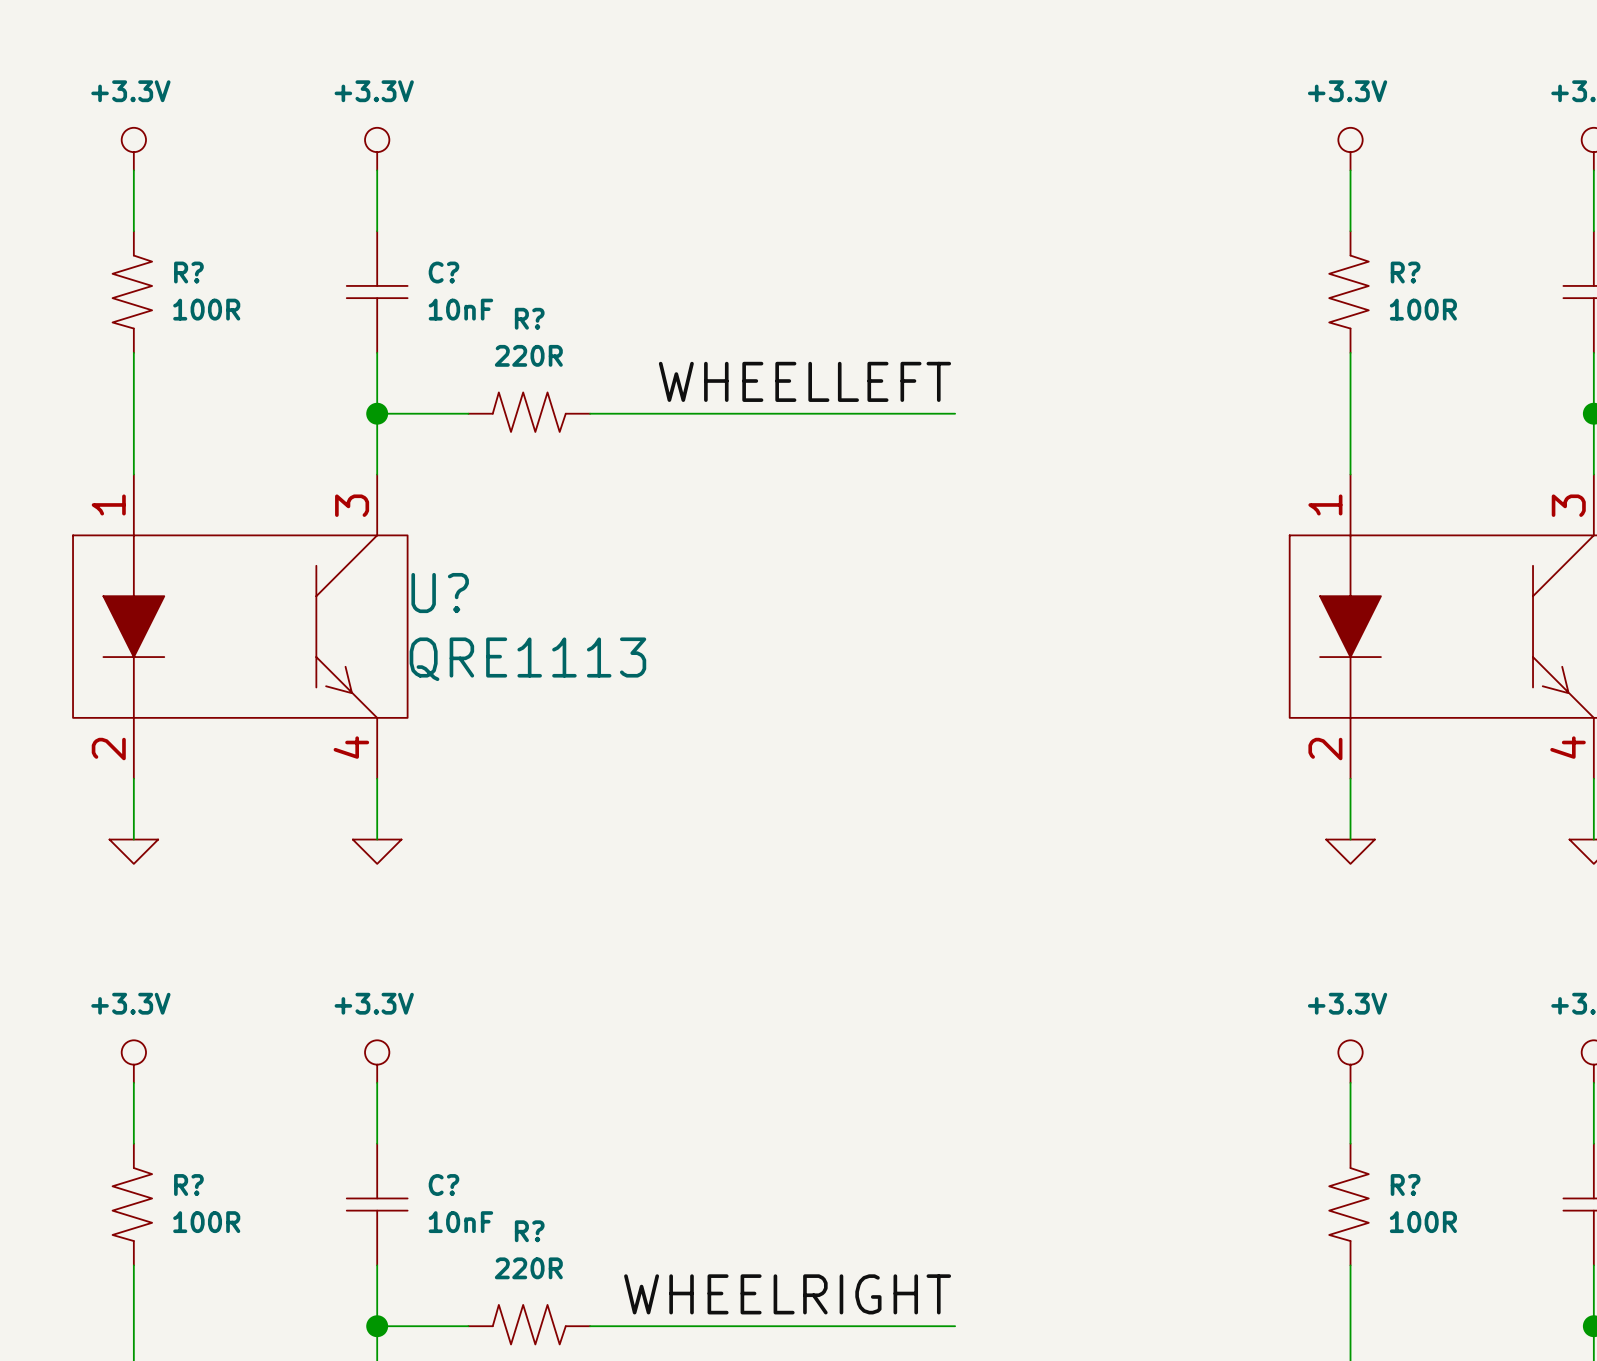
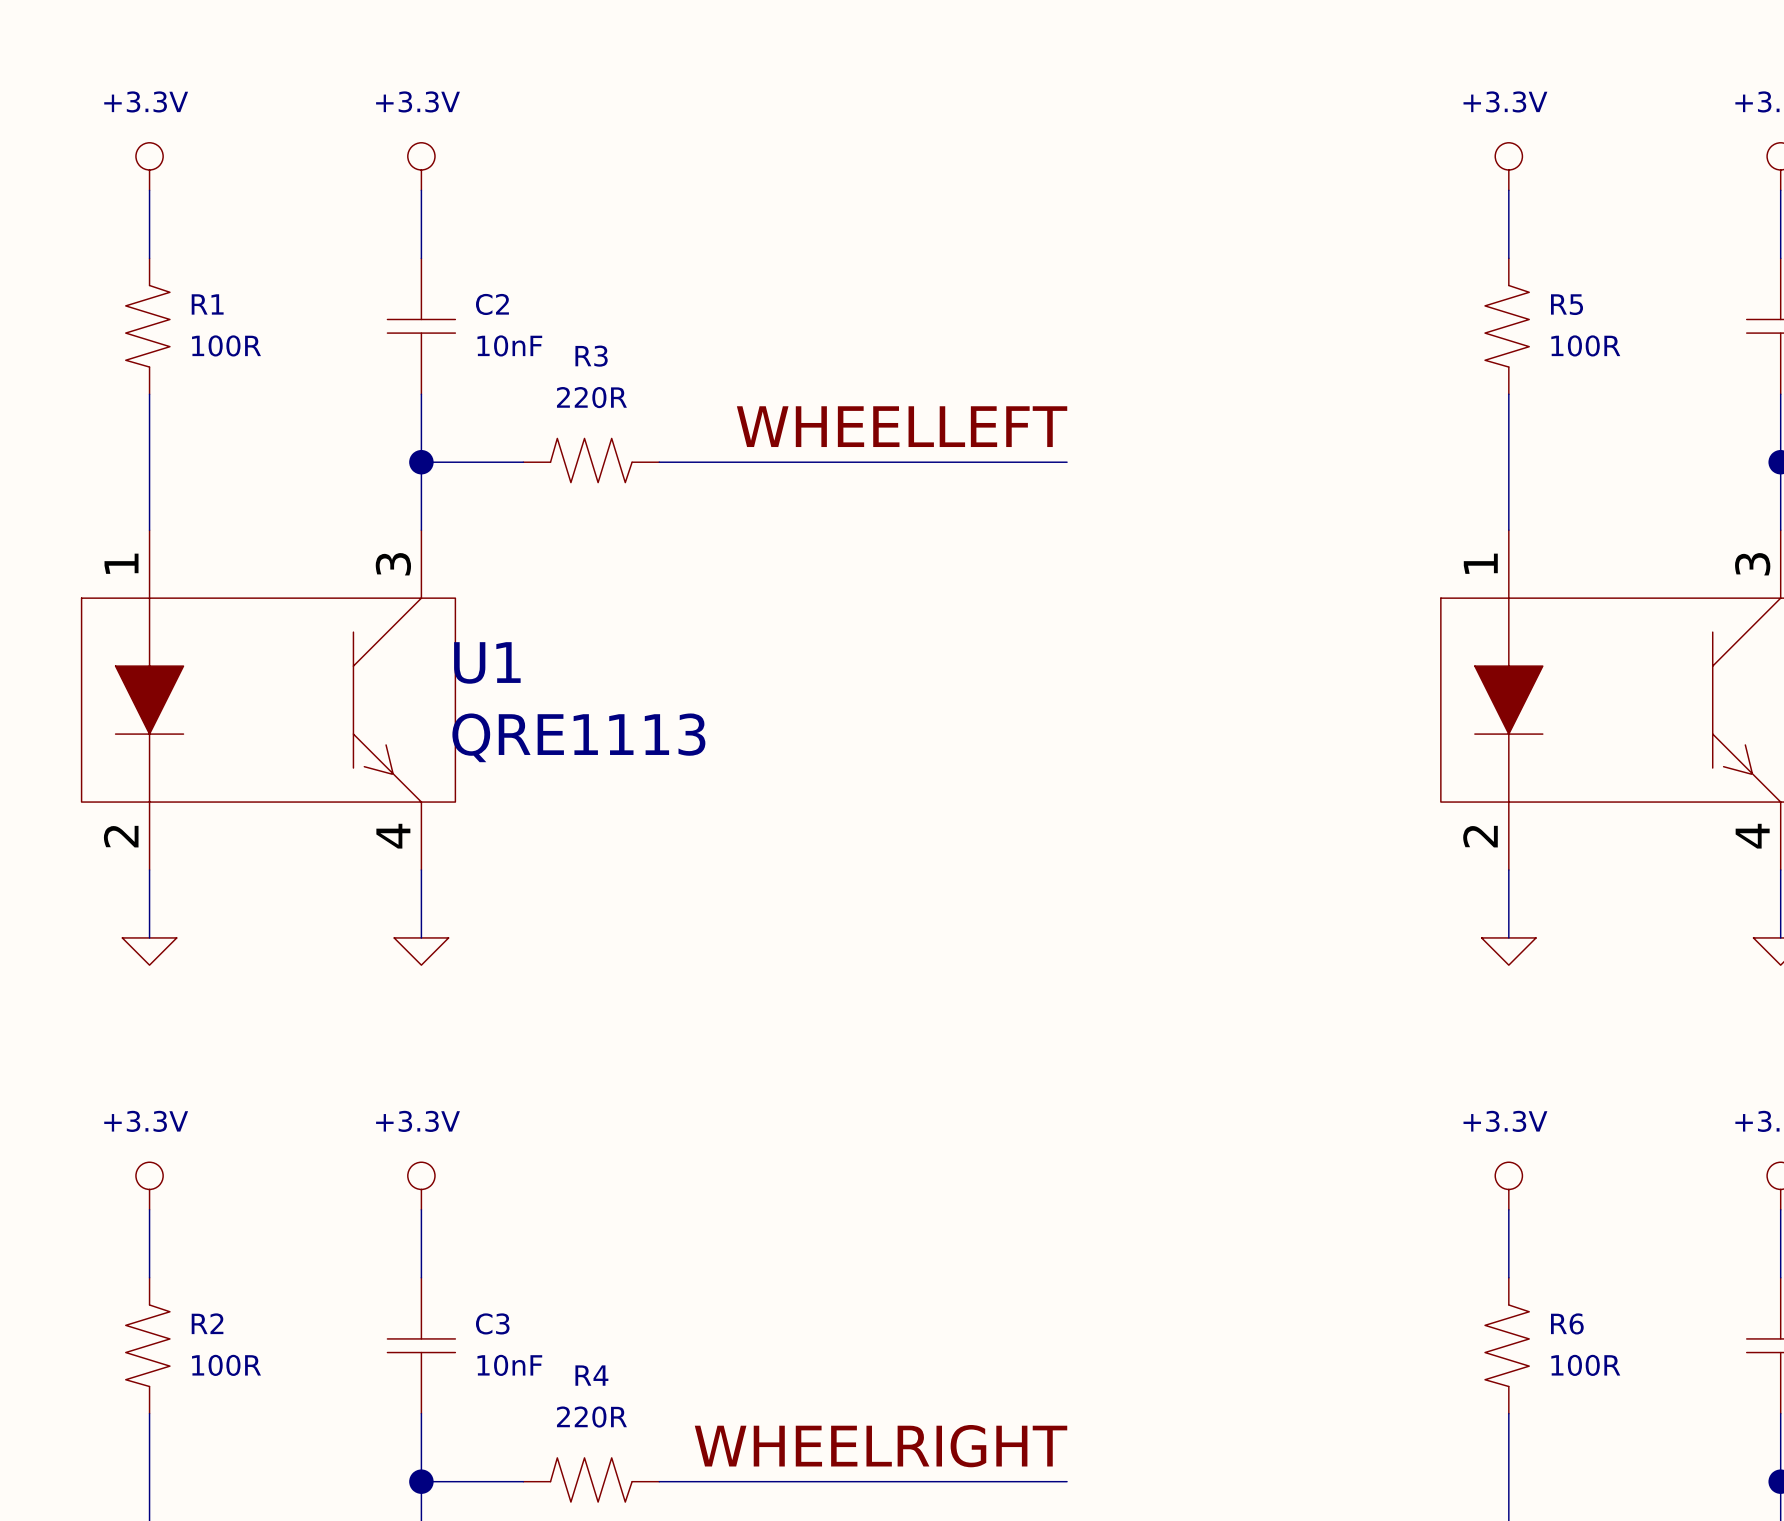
R? name: R? (188, 272) -> R1 (207, 304)
C? name: C? (443, 272) -> C2 (492, 304)
R? name: R? (1405, 272) -> R5 (1567, 304)
R? name: R? (529, 318) -> R3 (591, 356)
U? name: U? (440, 593) -> U1 (487, 662)
R? name: R? (188, 1185) -> R2 (207, 1323)
C? name: C? (443, 1185) -> C3 (492, 1323)
R? name: R? (1405, 1185) -> R6 (1567, 1323)
R? name: R? (529, 1231) -> R4 (591, 1375)

